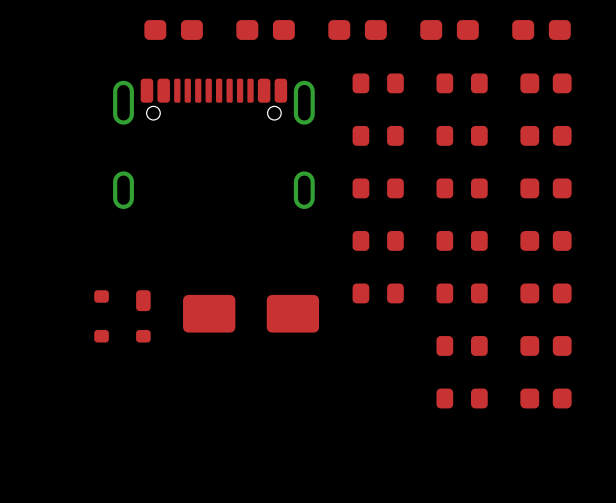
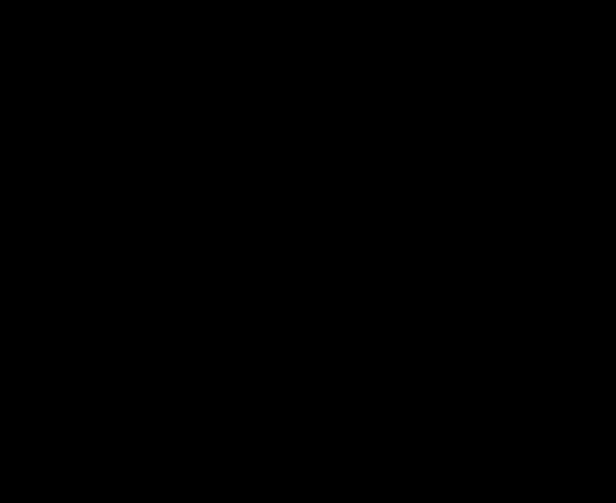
part: (173, 30) -> none
part: (265, 30) -> none
part: (357, 30) -> none
part: (449, 30) -> none
part: (541, 30) -> none
part: (378, 83) -> none
part: (462, 83) -> none
part: (546, 83) -> none
part: (378, 135) -> none
part: (462, 135) -> none
part: (546, 135) -> none
part: (213, 143) -> none
part: (378, 188) -> none
part: (462, 188) -> none
part: (546, 188) -> none
part: (378, 240) -> none
part: (462, 240) -> none
part: (546, 240) -> none
part: (378, 293) -> none
part: (462, 293) -> none
part: (546, 293) -> none
part: (251, 313) -> none
part: (122, 316) -> none
part: (462, 345) -> none
part: (546, 345) -> none
part: (462, 398) -> none
part: (546, 398) -> none

